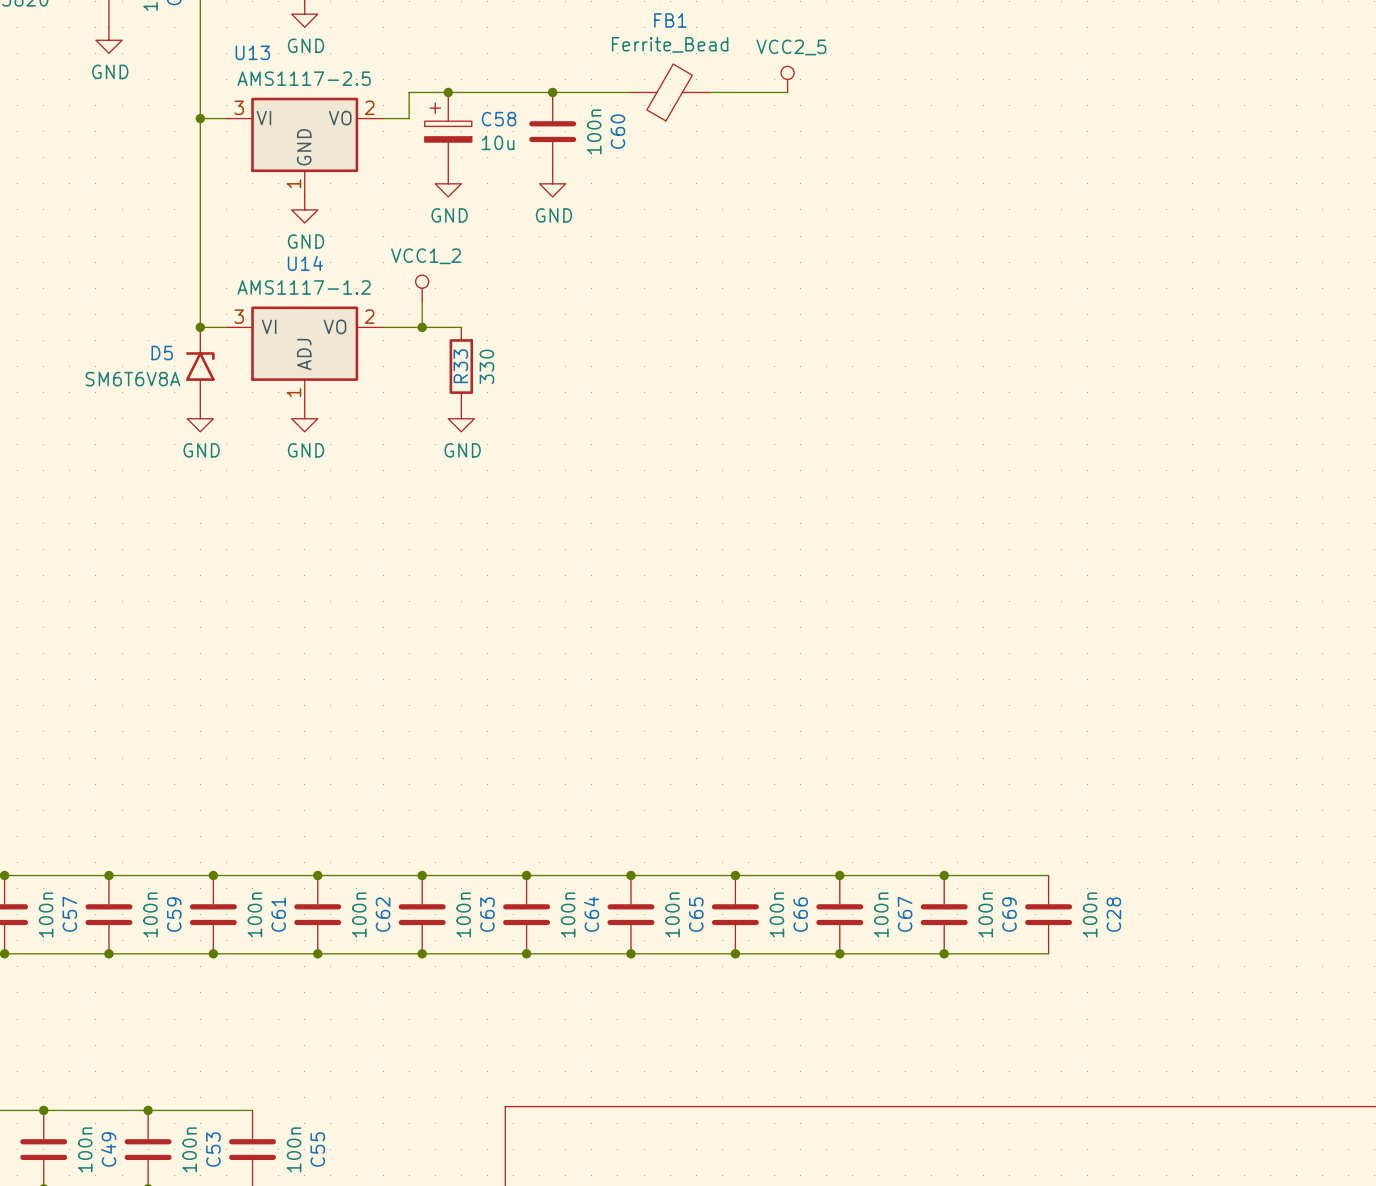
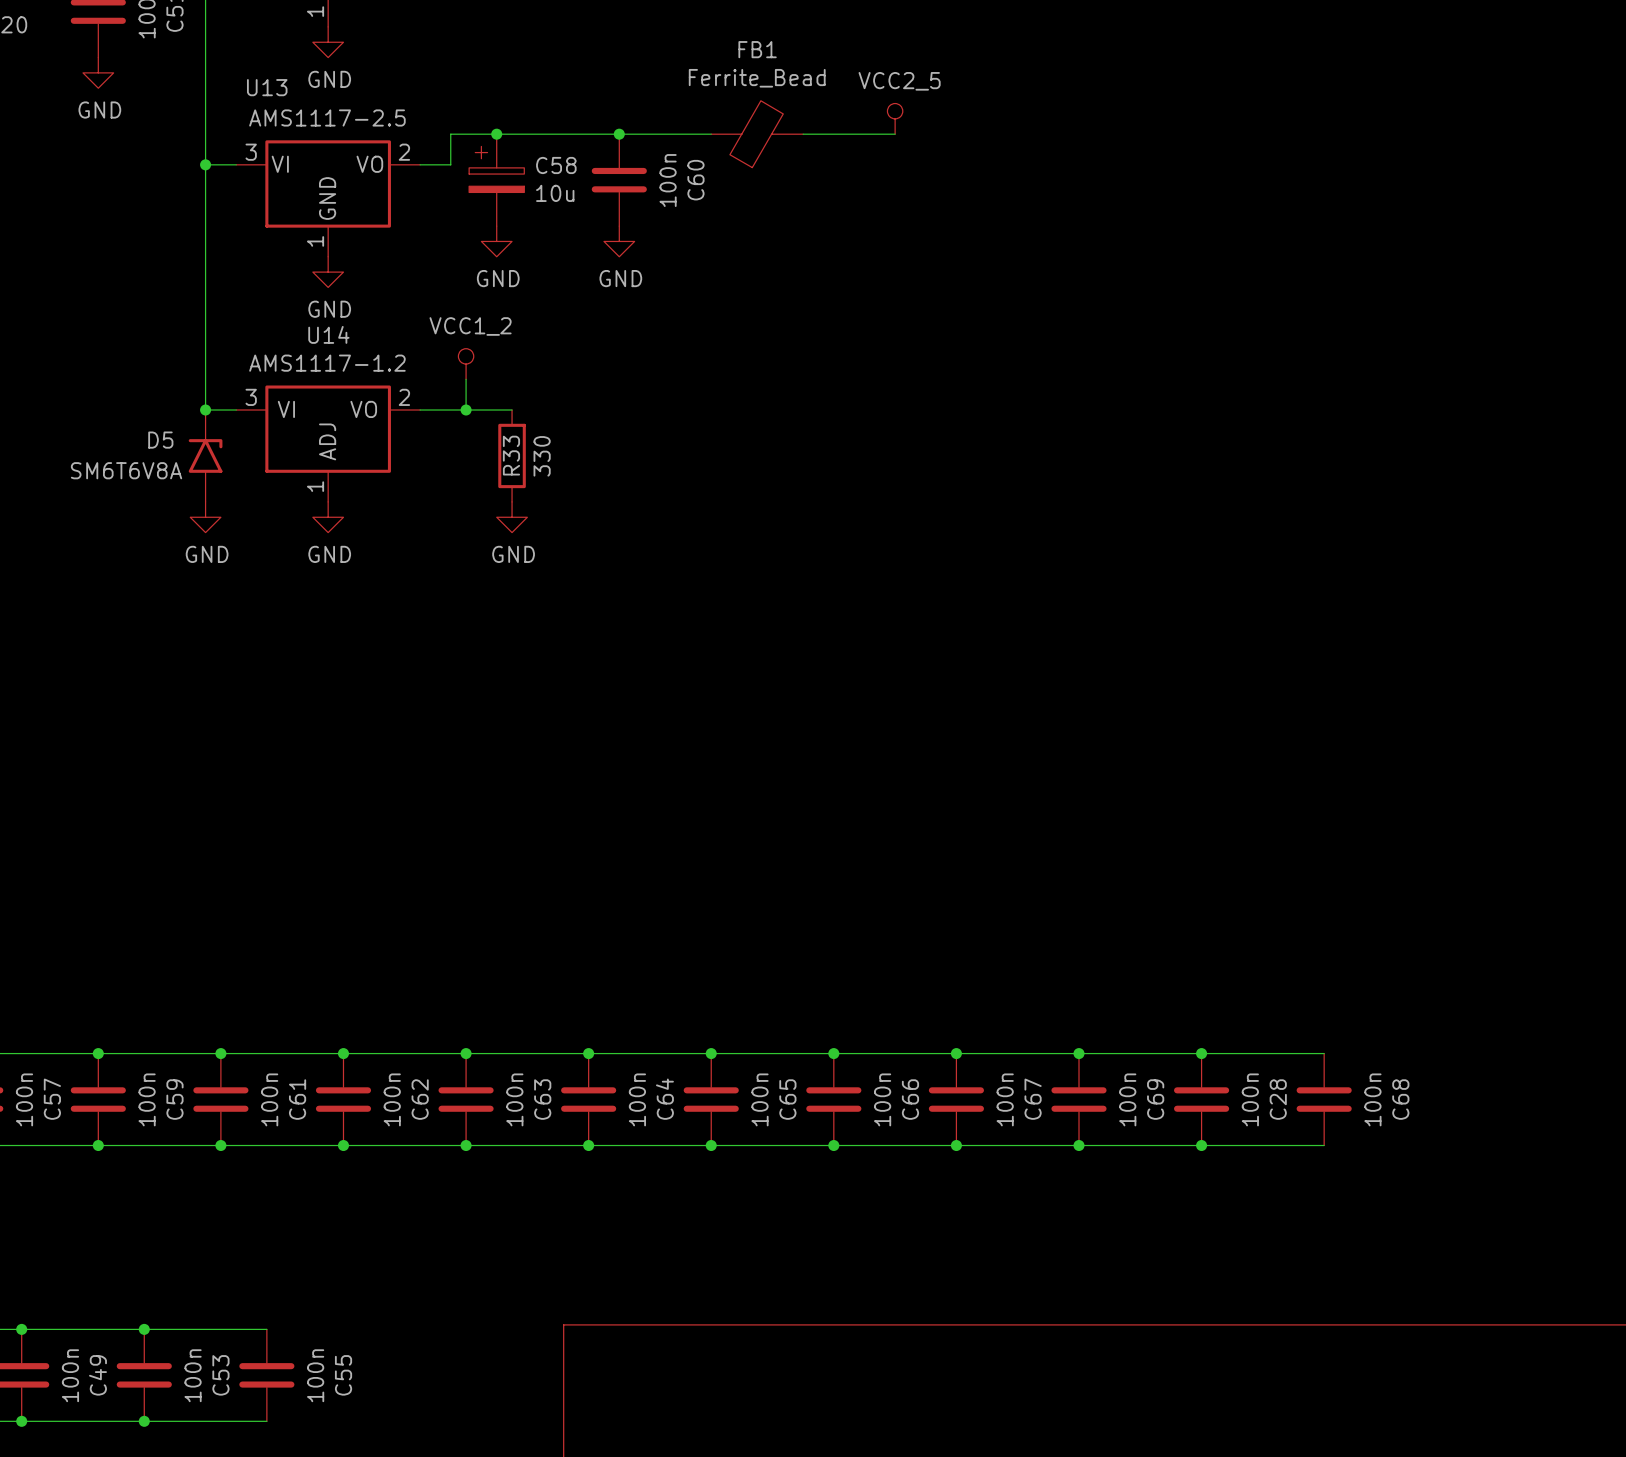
wire: none -> (1201, 1053) (1324, 1053)
junction: none -> (1201, 1053)
C68: none -> 100n (1324, 1099)
wire: none -> (1201, 1145) (1324, 1145)
junction: none -> (1201, 1145)

